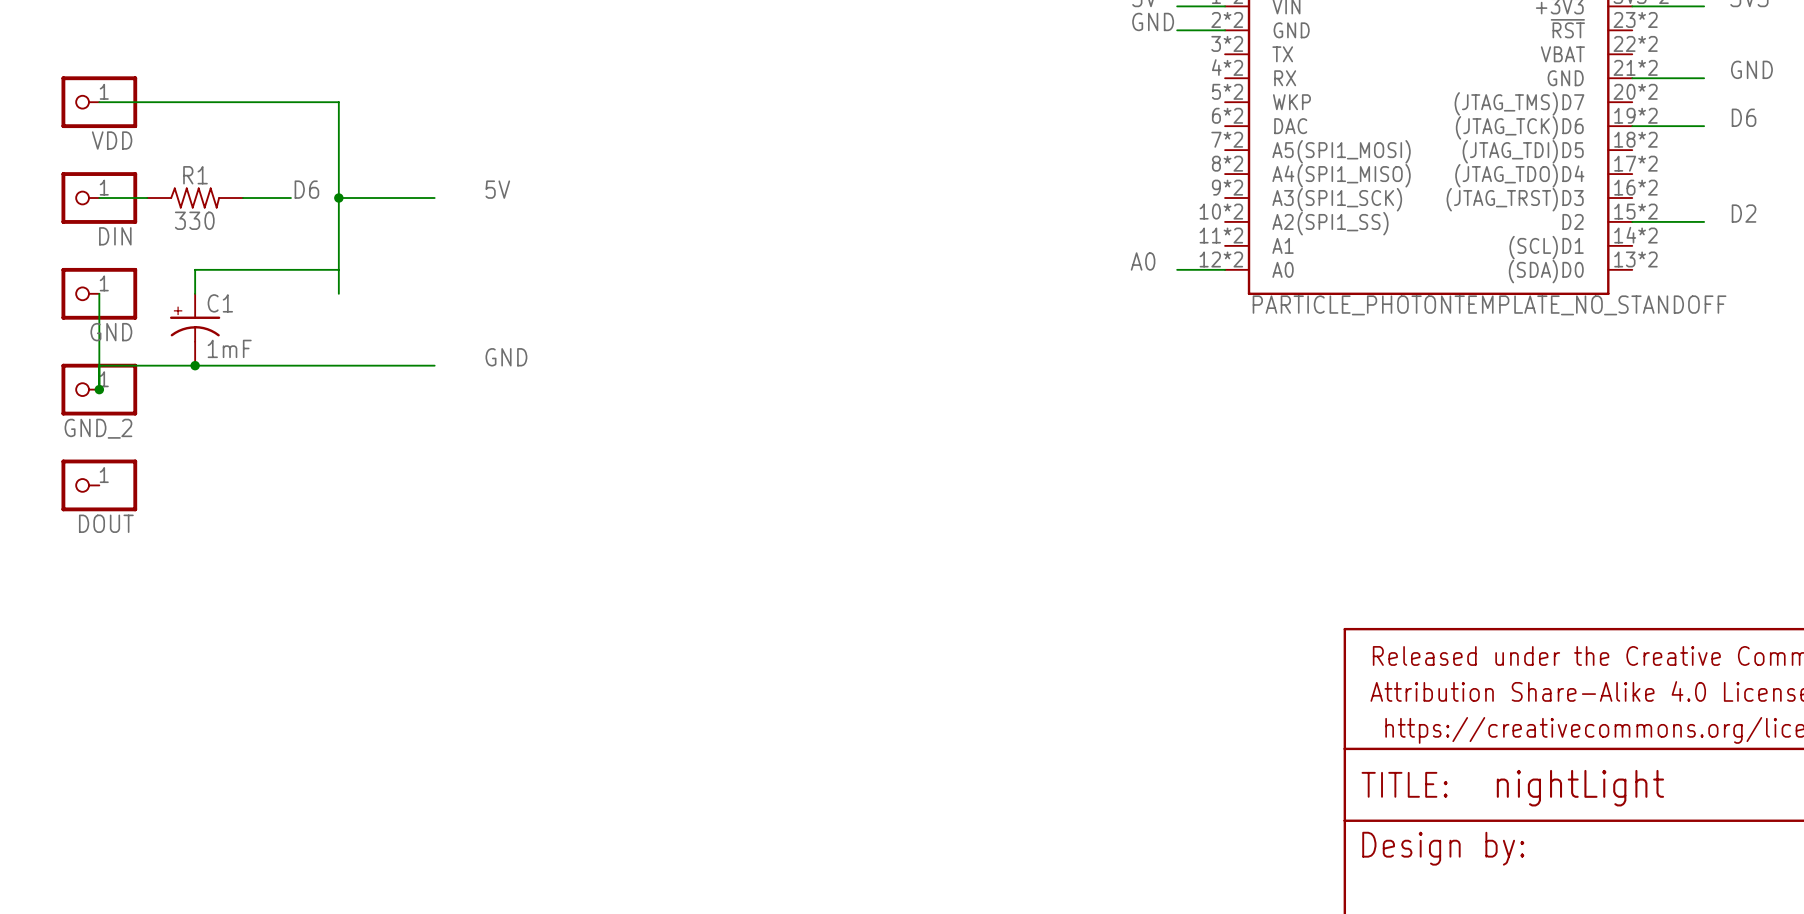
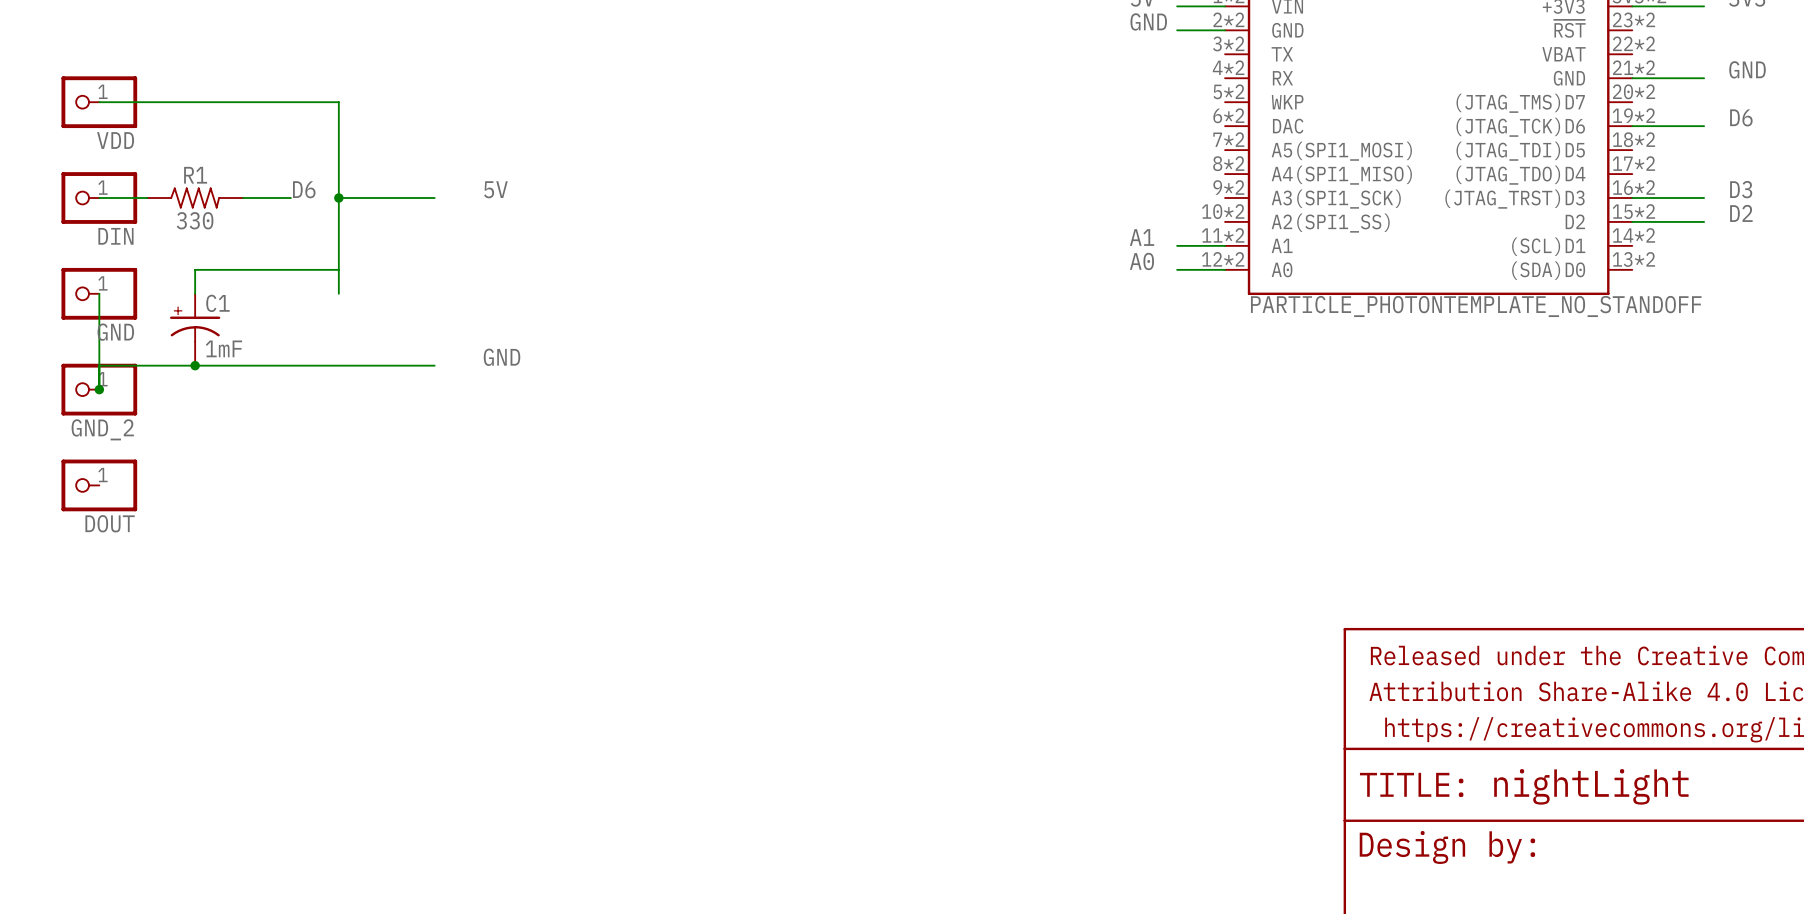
label: none -> D3 (1741, 189)
wire: none -> (1632, 198) (1704, 198)
label: none -> A1 (1142, 237)
wire: none -> (1177, 245) (1225, 245)

